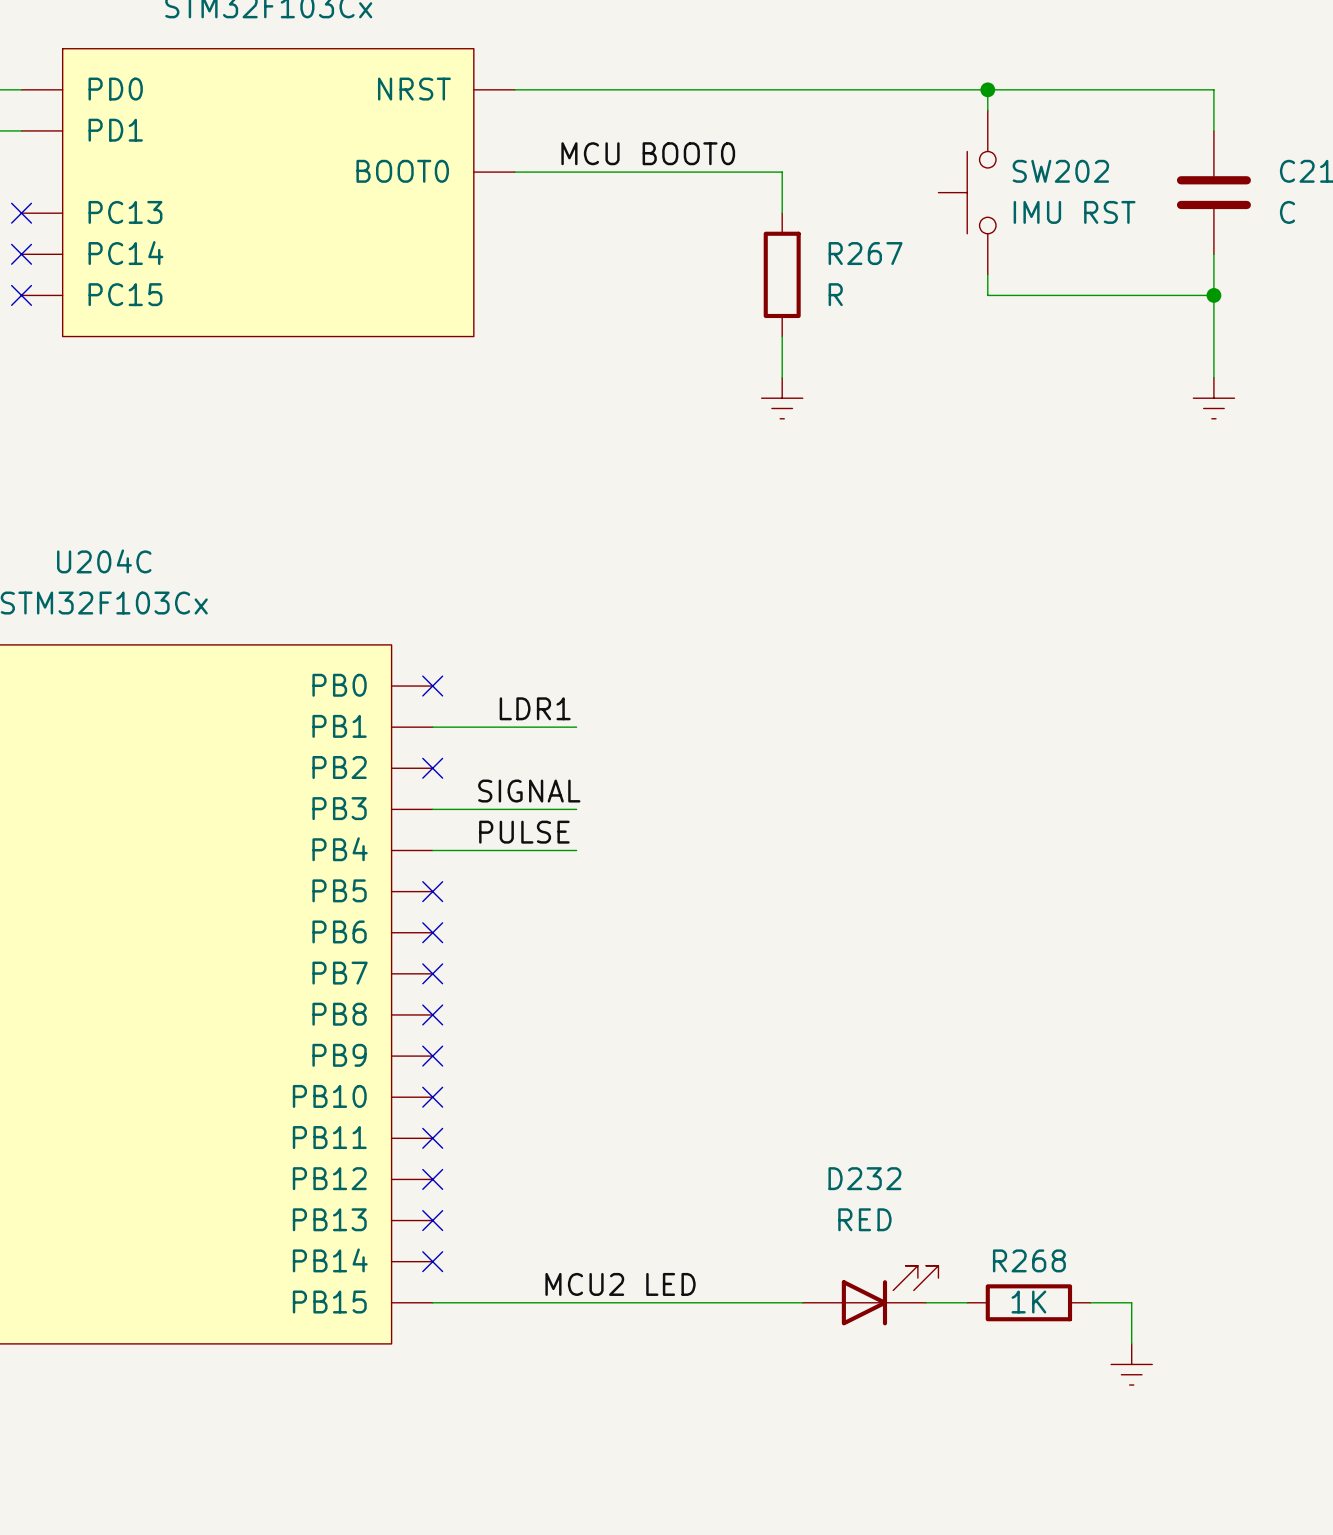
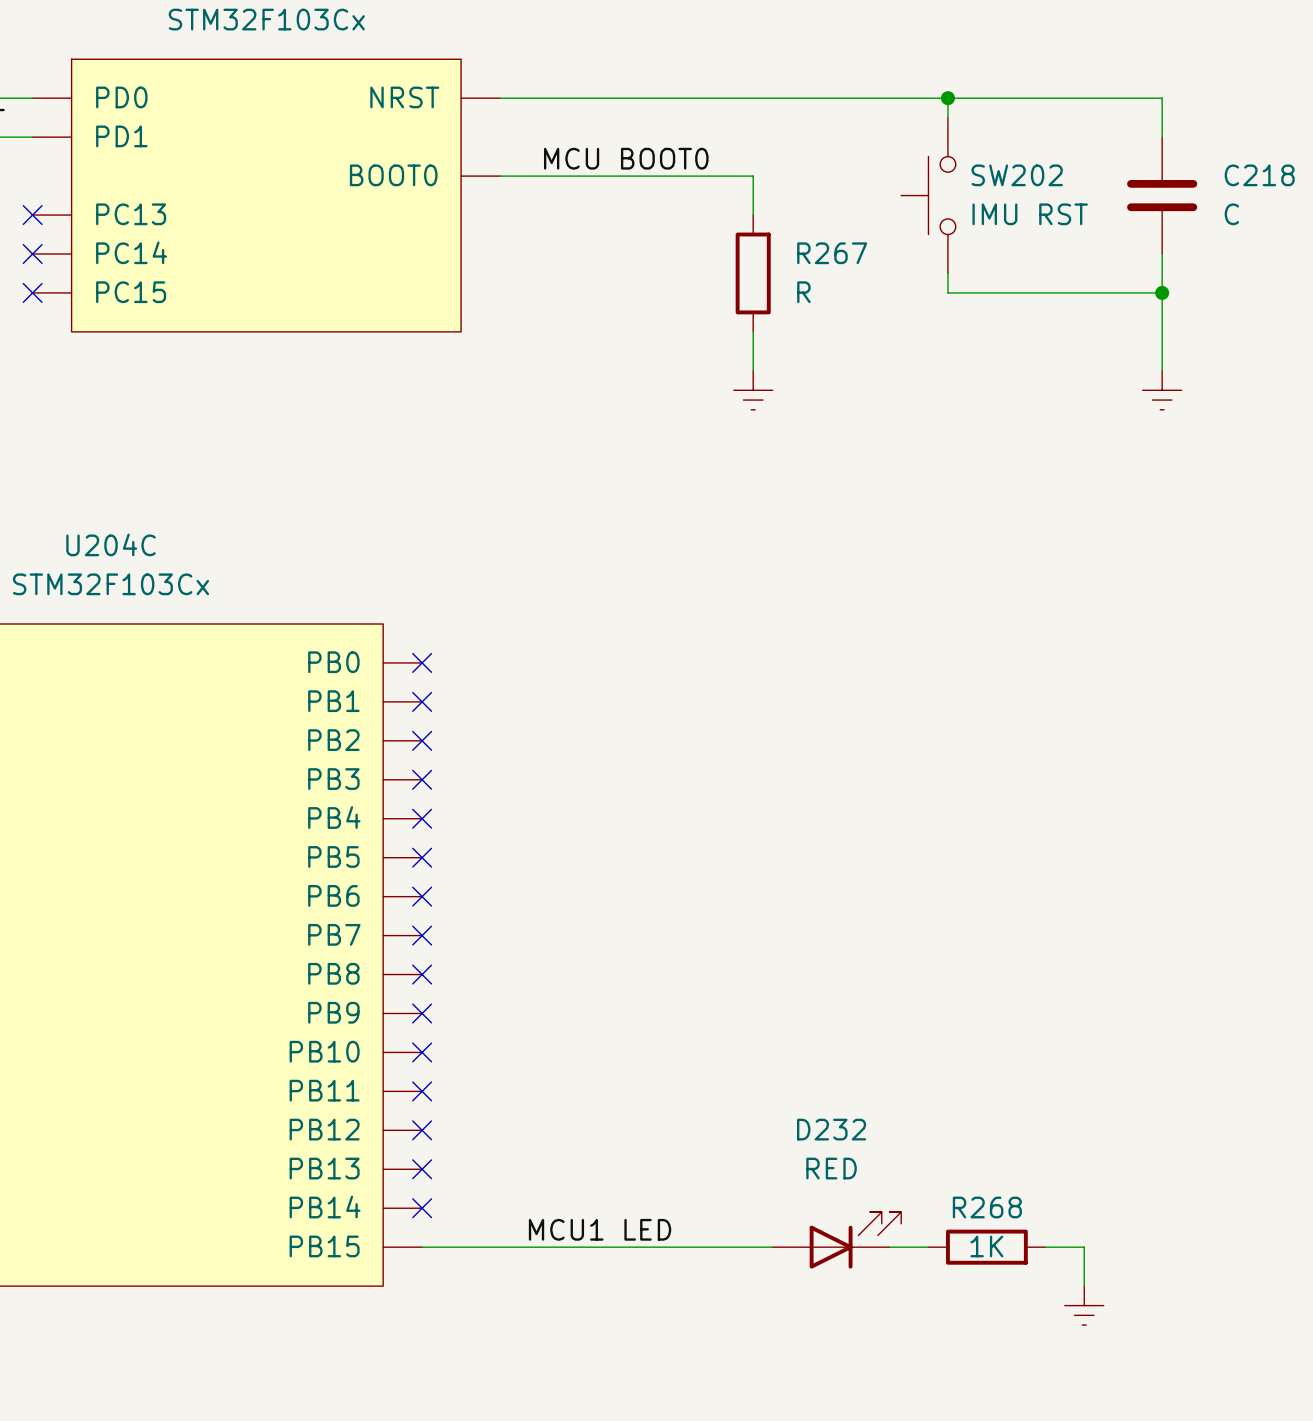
label: LDR1 (535, 708) -> none
wire: (432, 727) (576, 727) -> none
no-connect mark: none -> (422, 701)
label: SIGNAL (529, 791) -> none
wire: (432, 809) (576, 809) -> none
no-connect mark: none -> (422, 779)
label: PULSE (524, 832) -> none
wire: (432, 850) (576, 850) -> none
no-connect mark: none -> (422, 818)
label: MCU2 LED (620, 1284) -> MCU1 LED (600, 1229)

